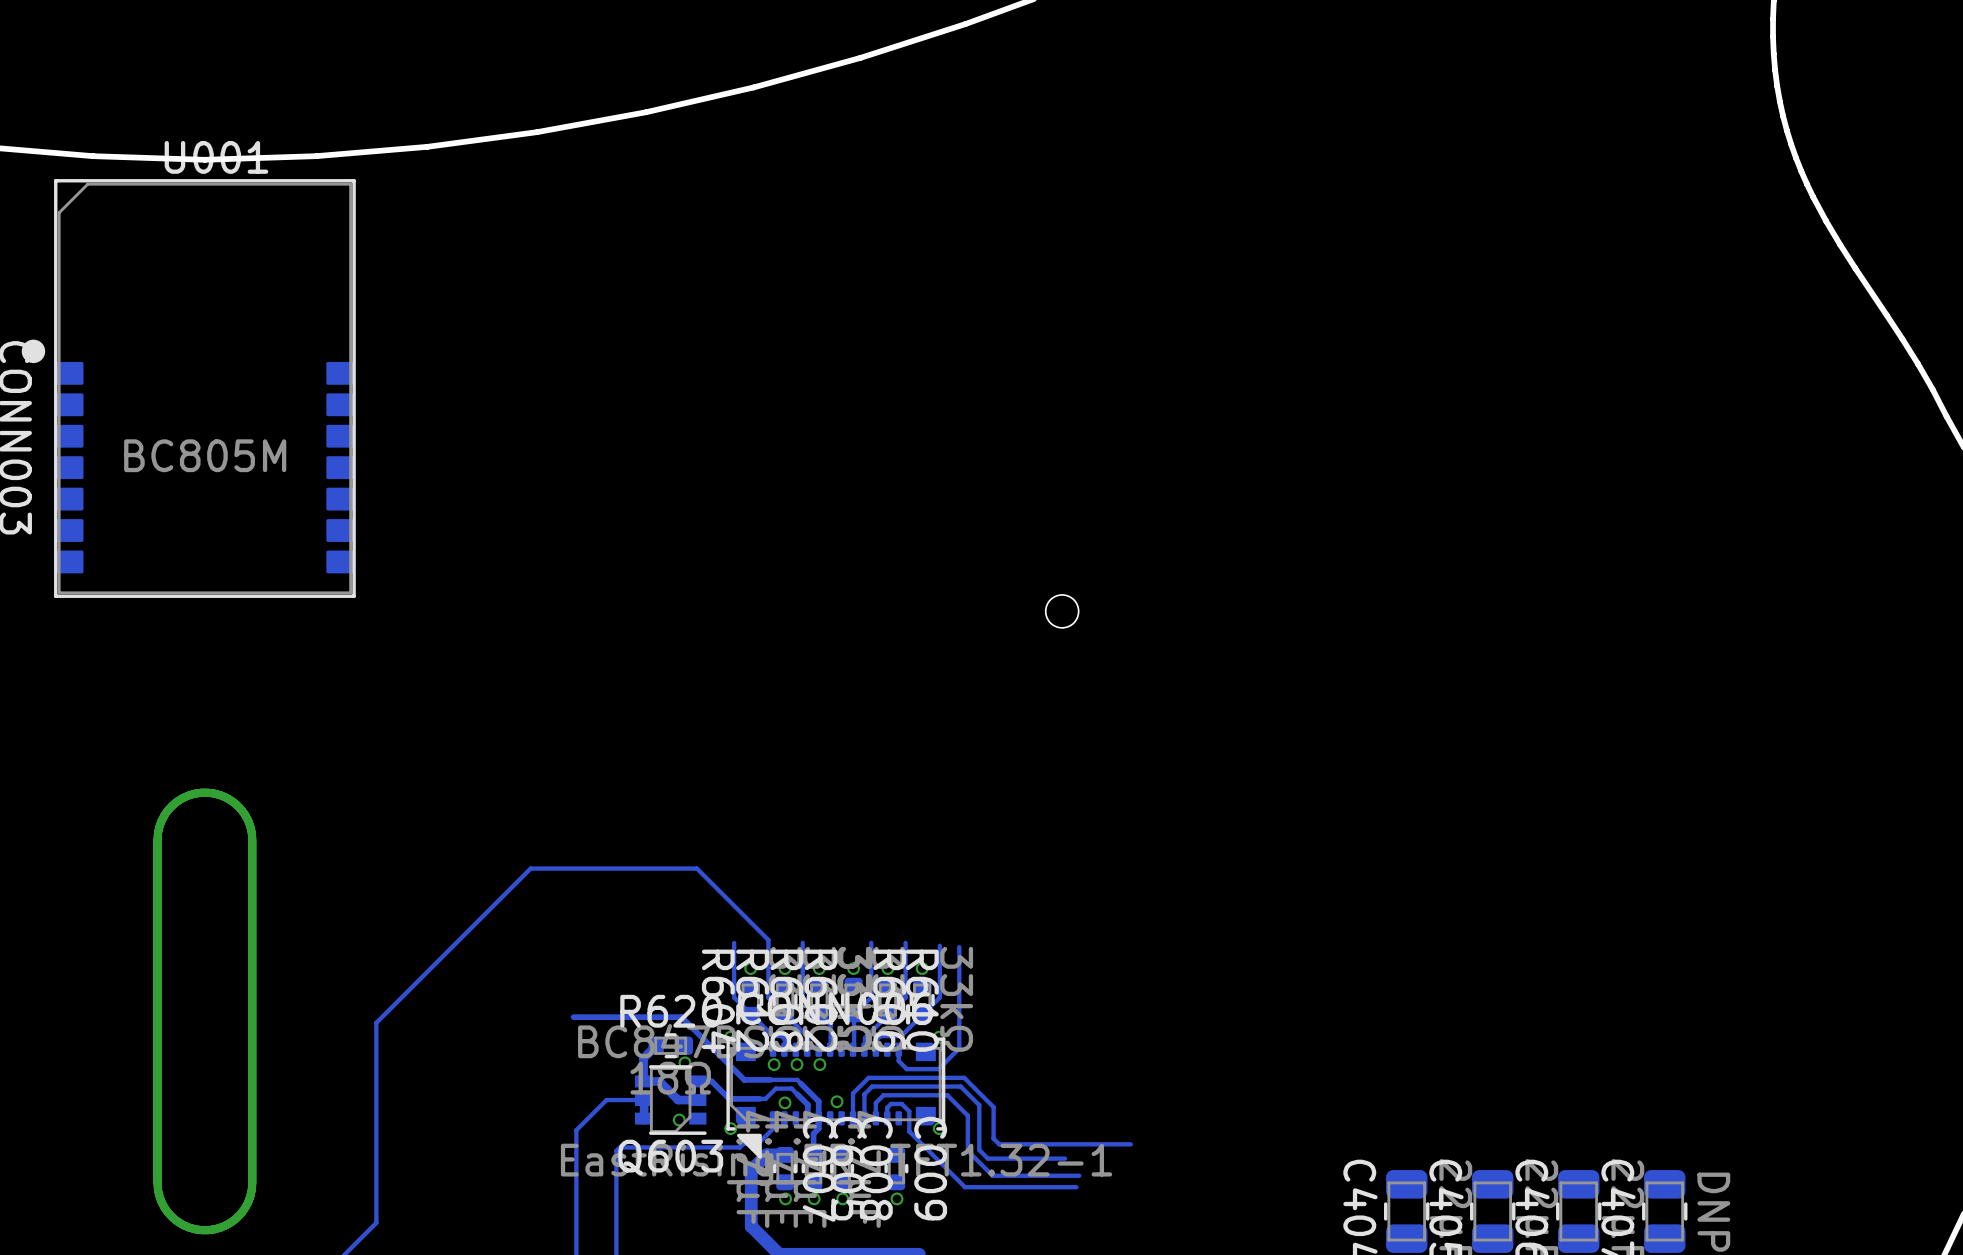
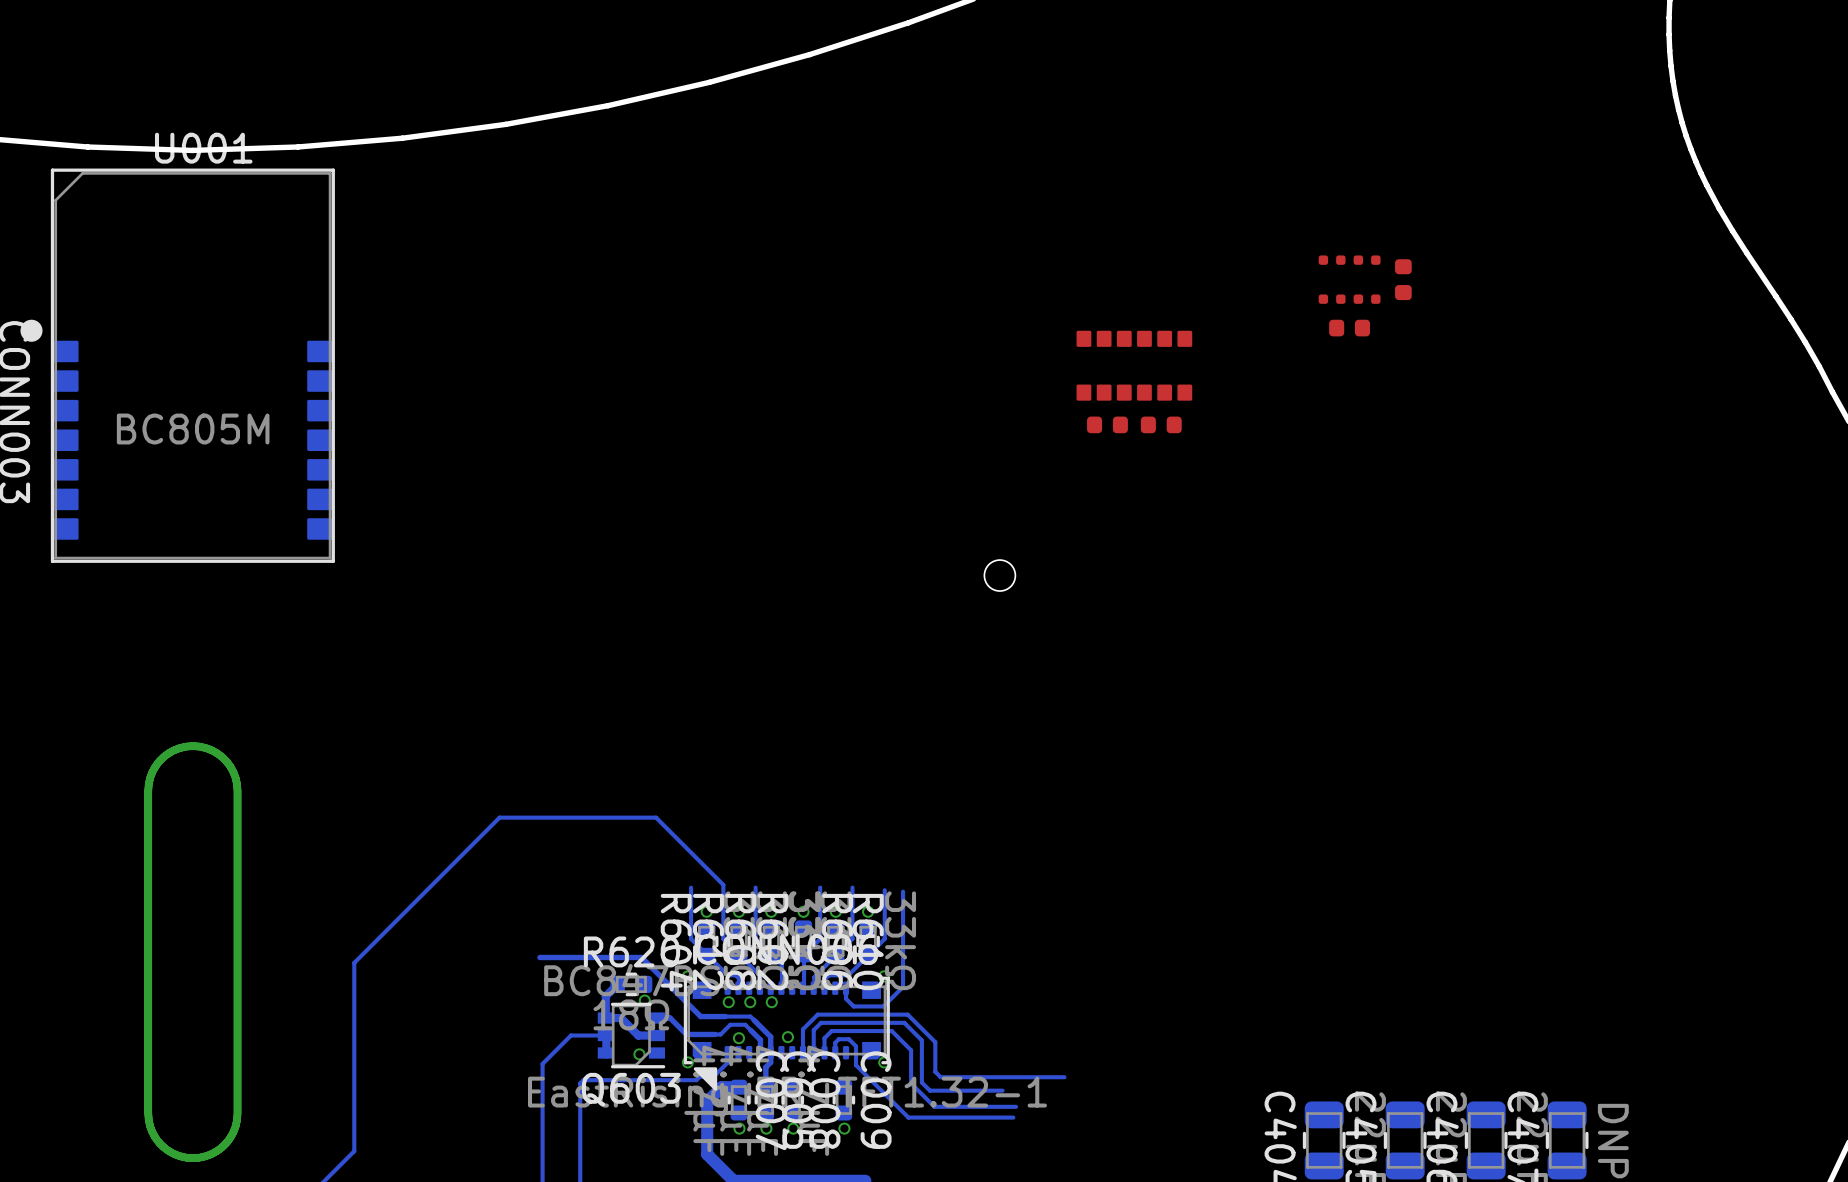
part: none -> (1349, 279)
part: none -> (1403, 279)
part: none -> (1349, 328)
part: none -> (1134, 365)
part: none -> (1107, 424)
part: none -> (1161, 424)

